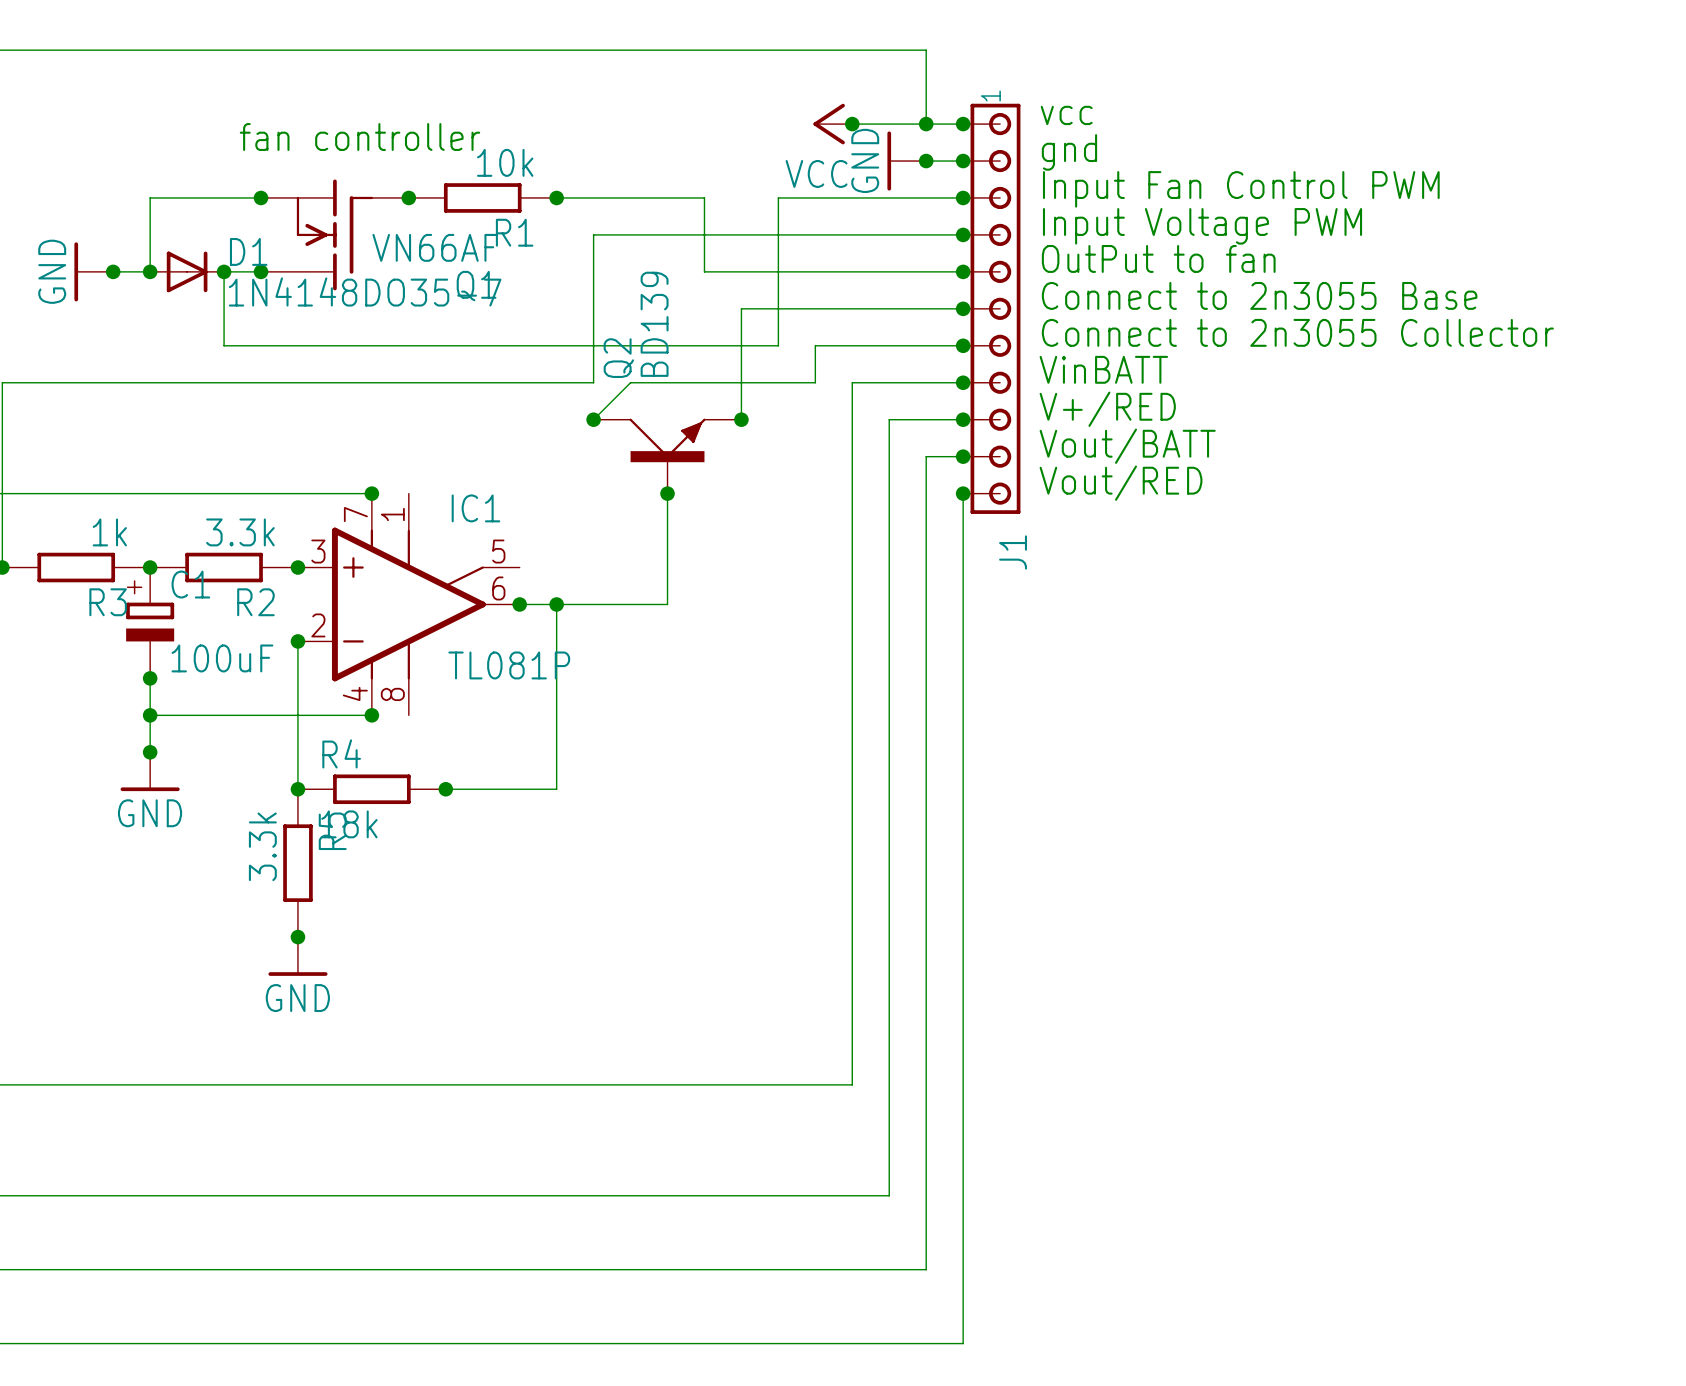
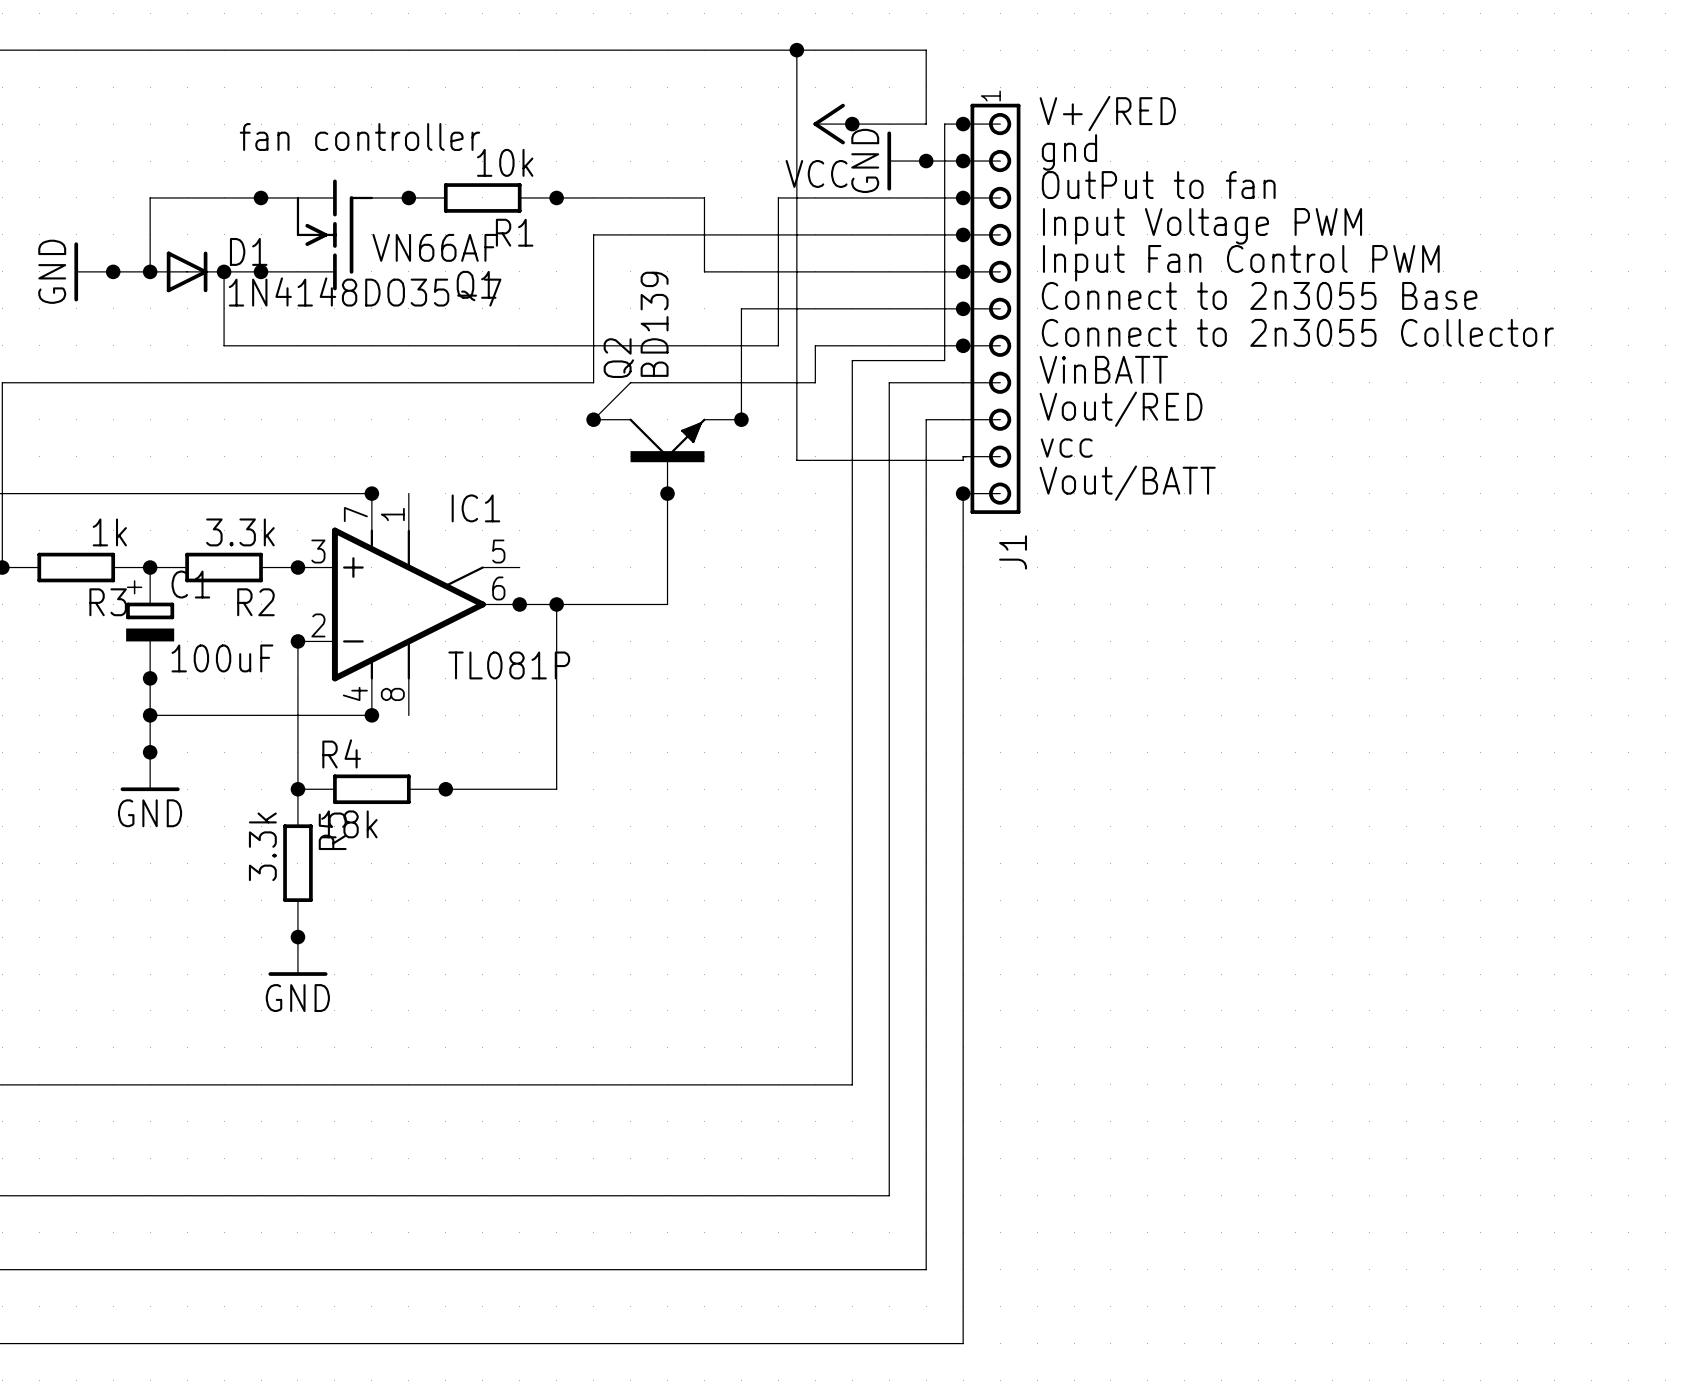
wire: none -> (796, 50) (796, 460) (963, 460) (963, 456) (966, 456)
junction: none -> (796, 50)
text: vcc (1066, 115) -> V+/RED (1107, 113)
wire: (926, 124) (944, 124) -> (852, 382) (852, 360) (944, 360) (944, 124)
junction: (926, 124) -> none
text: Input Fan Control PWM (1241, 189) -> OutPut to fan (1158, 185)
text: OutPut to fan (1158, 258) -> Input Fan Control PWM (1241, 263)
wire: (852, 382) (889, 382) -> (889, 419) (889, 382)
junction: (963, 382) -> none
text: V+/RED (1107, 409) -> Vout/RED (1121, 409)
wire: (889, 419) (926, 419) -> none
junction: (963, 419) -> none
text: Vout/BATT (1127, 446) -> vcc (1066, 448)
wire: (926, 456) (963, 456) -> (926, 456) (926, 419)
junction: (963, 456) -> none
text: Vout/RED (1121, 483) -> Vout/BATT (1127, 483)

